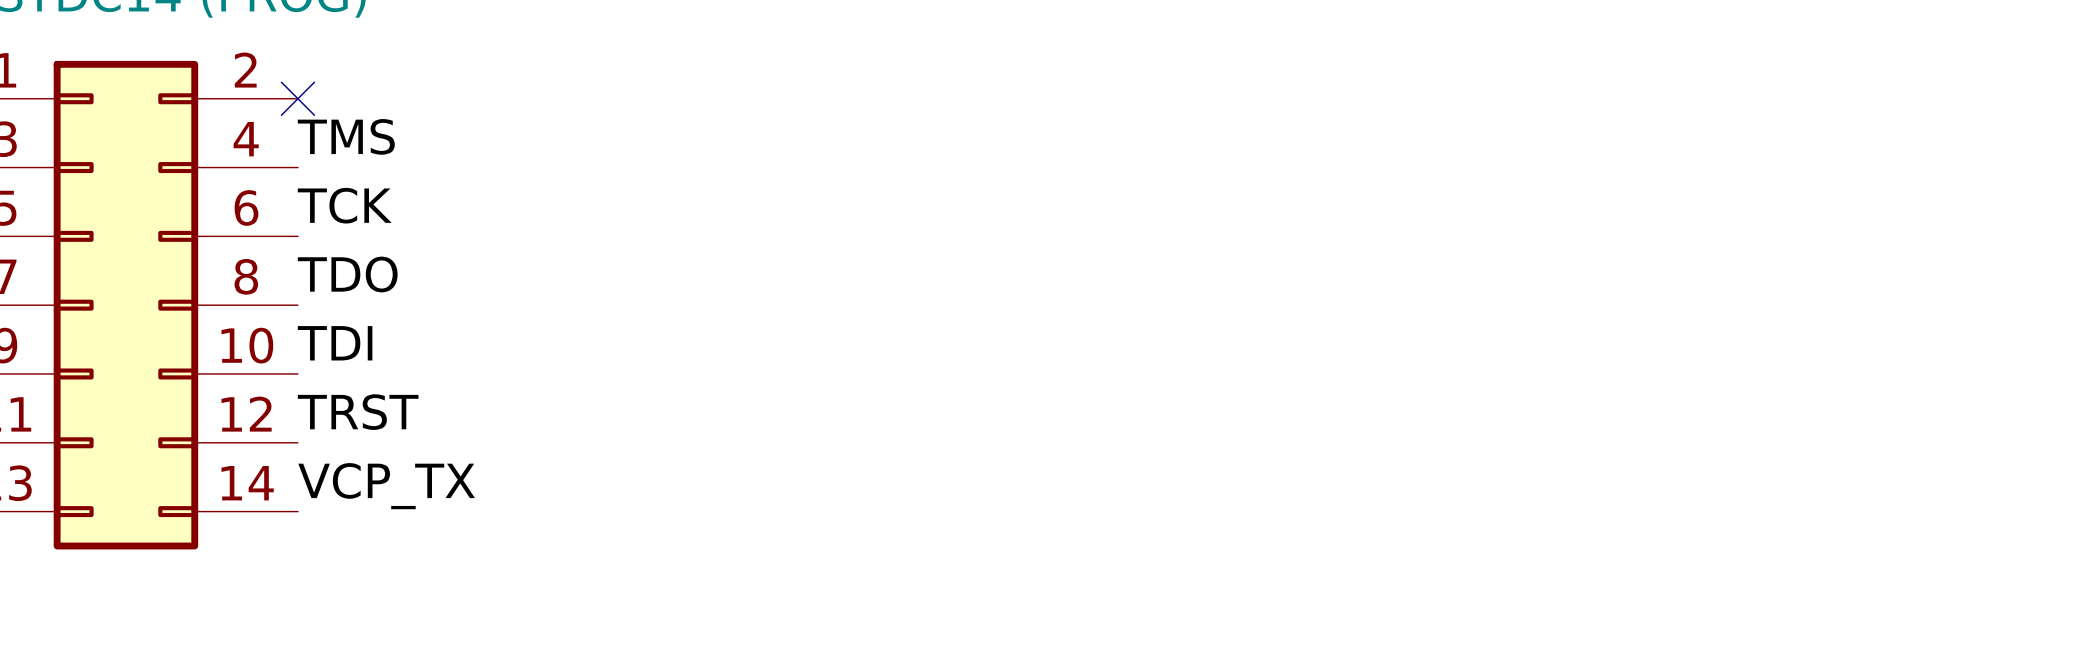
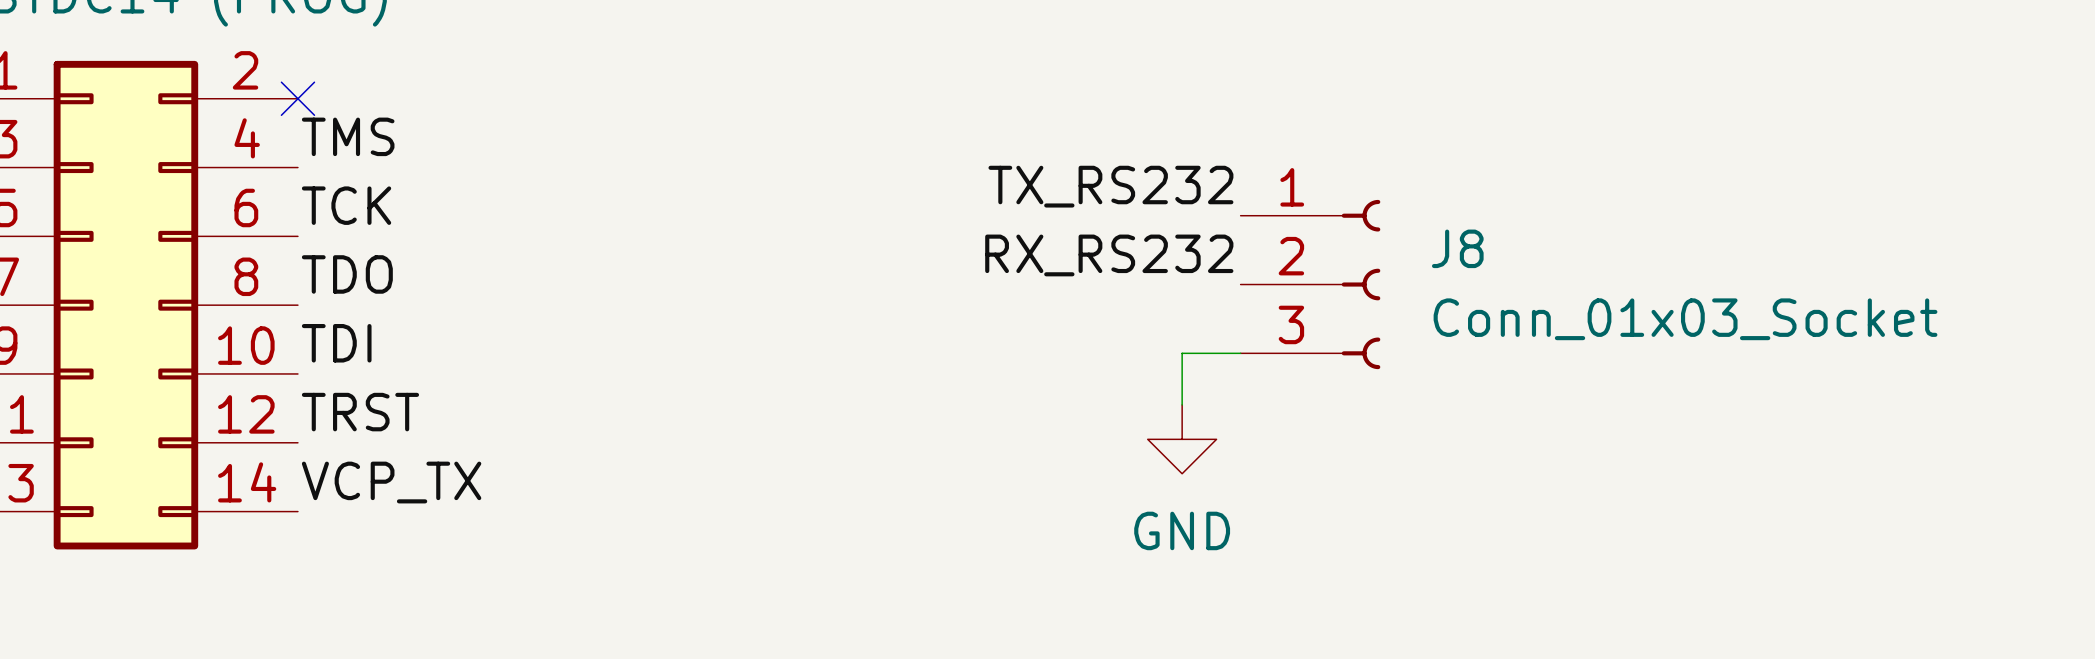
label: none -> TX_RS232 (1110, 186)
label: none -> RX_RS232 (1109, 255)
J8: none -> Conn_01x03_Socket (1310, 284)
wire: none -> (1240, 353) (1182, 353) (1182, 404)
power symbol: none -> GND (1182, 439)

